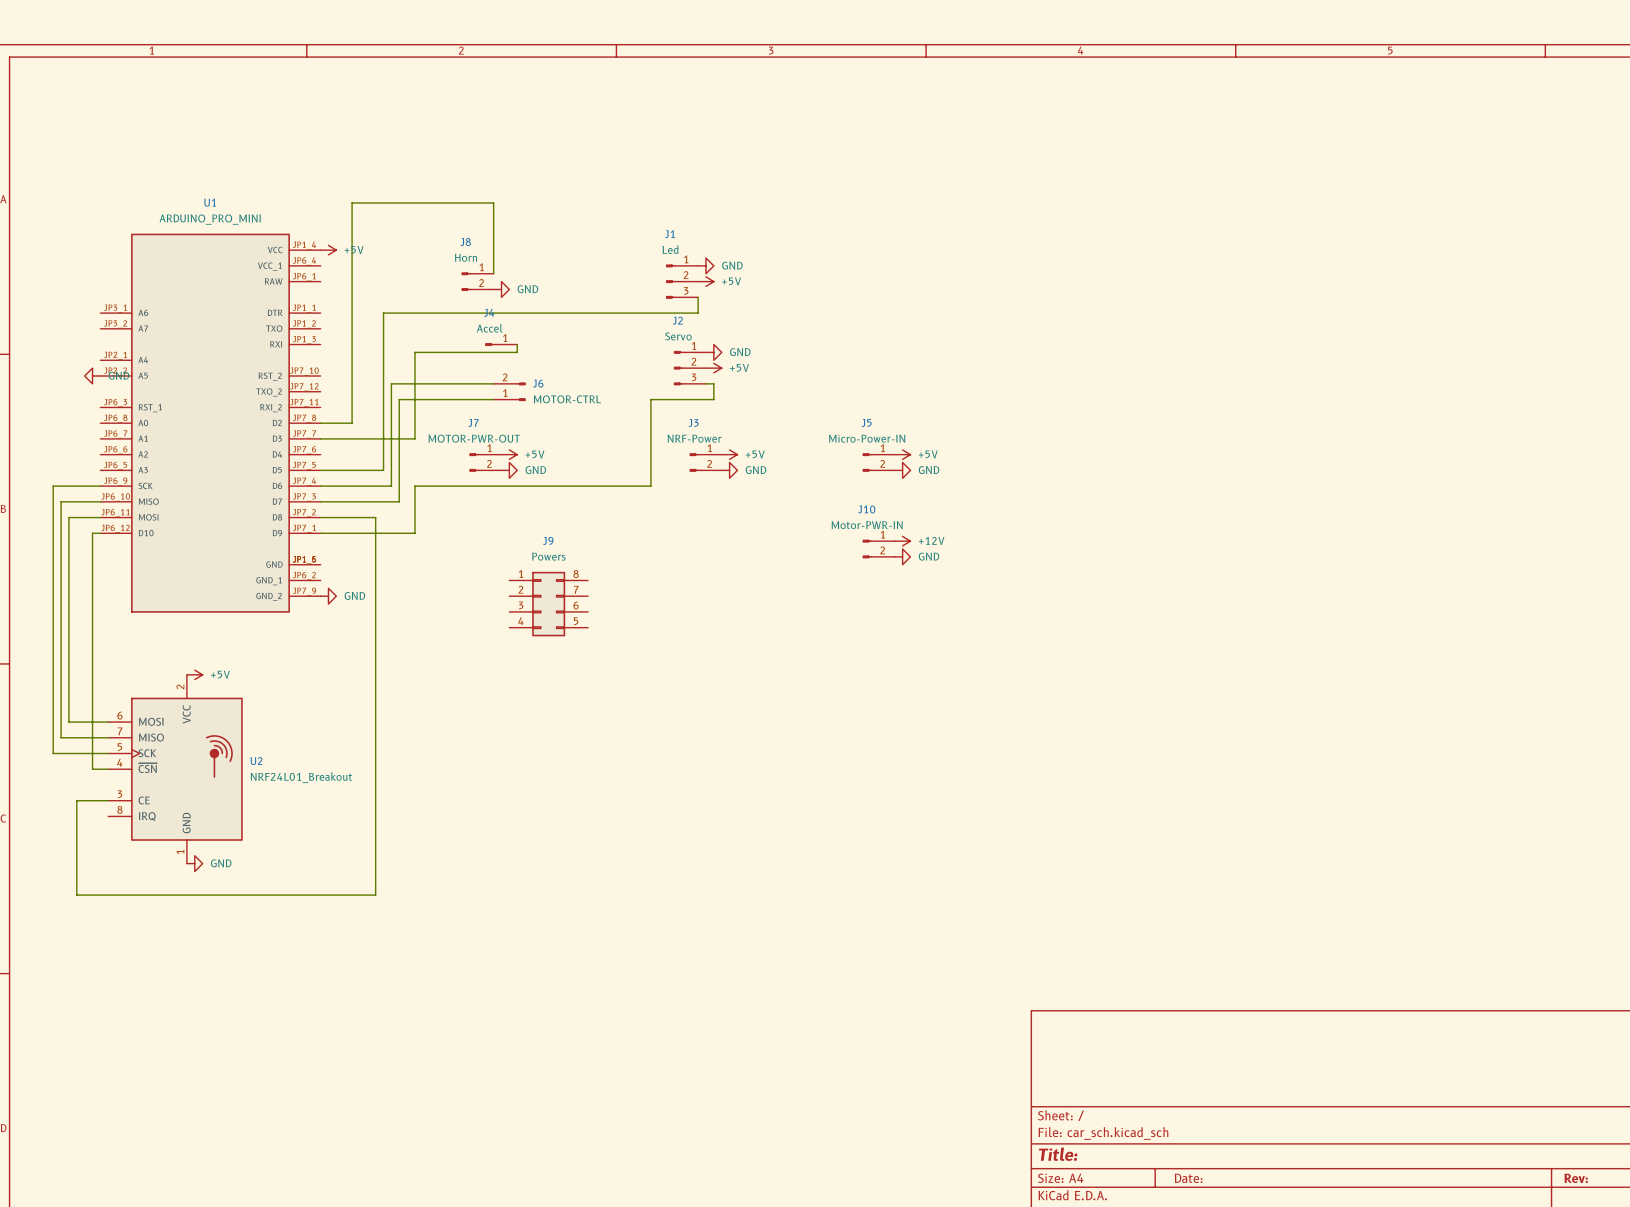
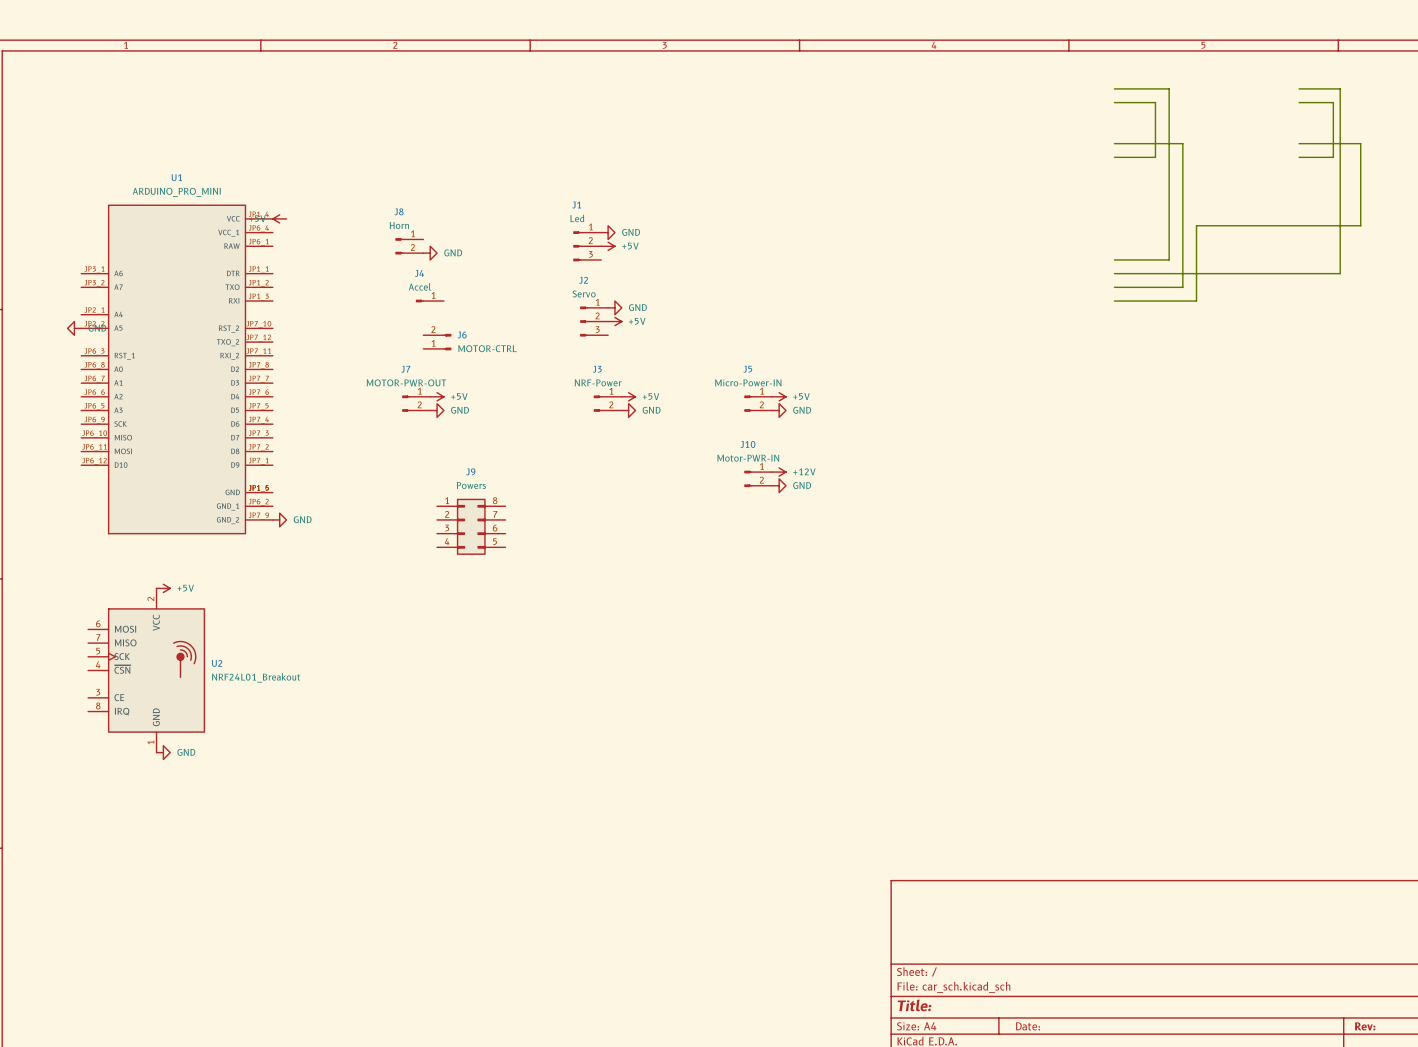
wire: none -> (1114, 88) (1169, 88) (1169, 259) (1114, 259)
wire: none -> (1299, 88) (1340, 88) (1340, 273) (1114, 273)
wire: none -> (1114, 102) (1155, 102) (1155, 157) (1114, 157)
wire: none -> (1299, 102) (1333, 102) (1333, 157) (1299, 157)
wire: none -> (1114, 143) (1182, 143) (1182, 287) (1114, 287)
wire: none -> (1299, 143) (1360, 143) (1360, 225) (1196, 225) (1196, 301) (1114, 301)
power symbol rotation: 0° (328, 250) -> 180° (279, 218)
wire: (493, 273) (493, 202) (352, 202) (352, 423) (320, 423) -> none
wire: (698, 297) (698, 313) (383, 313) (383, 470) (320, 470) -> none
wire: (517, 344) (517, 352) (414, 352) (414, 438) (320, 438) -> none
wire: (493, 383) (391, 383) (391, 486) (320, 486) -> none
wire: (705, 383) (713, 383) (713, 399) (650, 399) (650, 486) (414, 486) (414, 533) (320, 533) -> none
wire: (493, 399) (399, 399) (399, 501) (320, 501) -> none
wire: (100, 486) (53, 486) (53, 753) (108, 753) -> none
wire: (100, 501) (61, 501) (61, 737) (108, 737) -> none
wire: (100, 517) (68, 517) (68, 722) (108, 722) -> none
wire: (320, 517) (375, 517) (375, 895) (76, 895) (76, 800) (108, 800) -> none
wire: (100, 533) (92, 533) (92, 769) (108, 769) -> none

